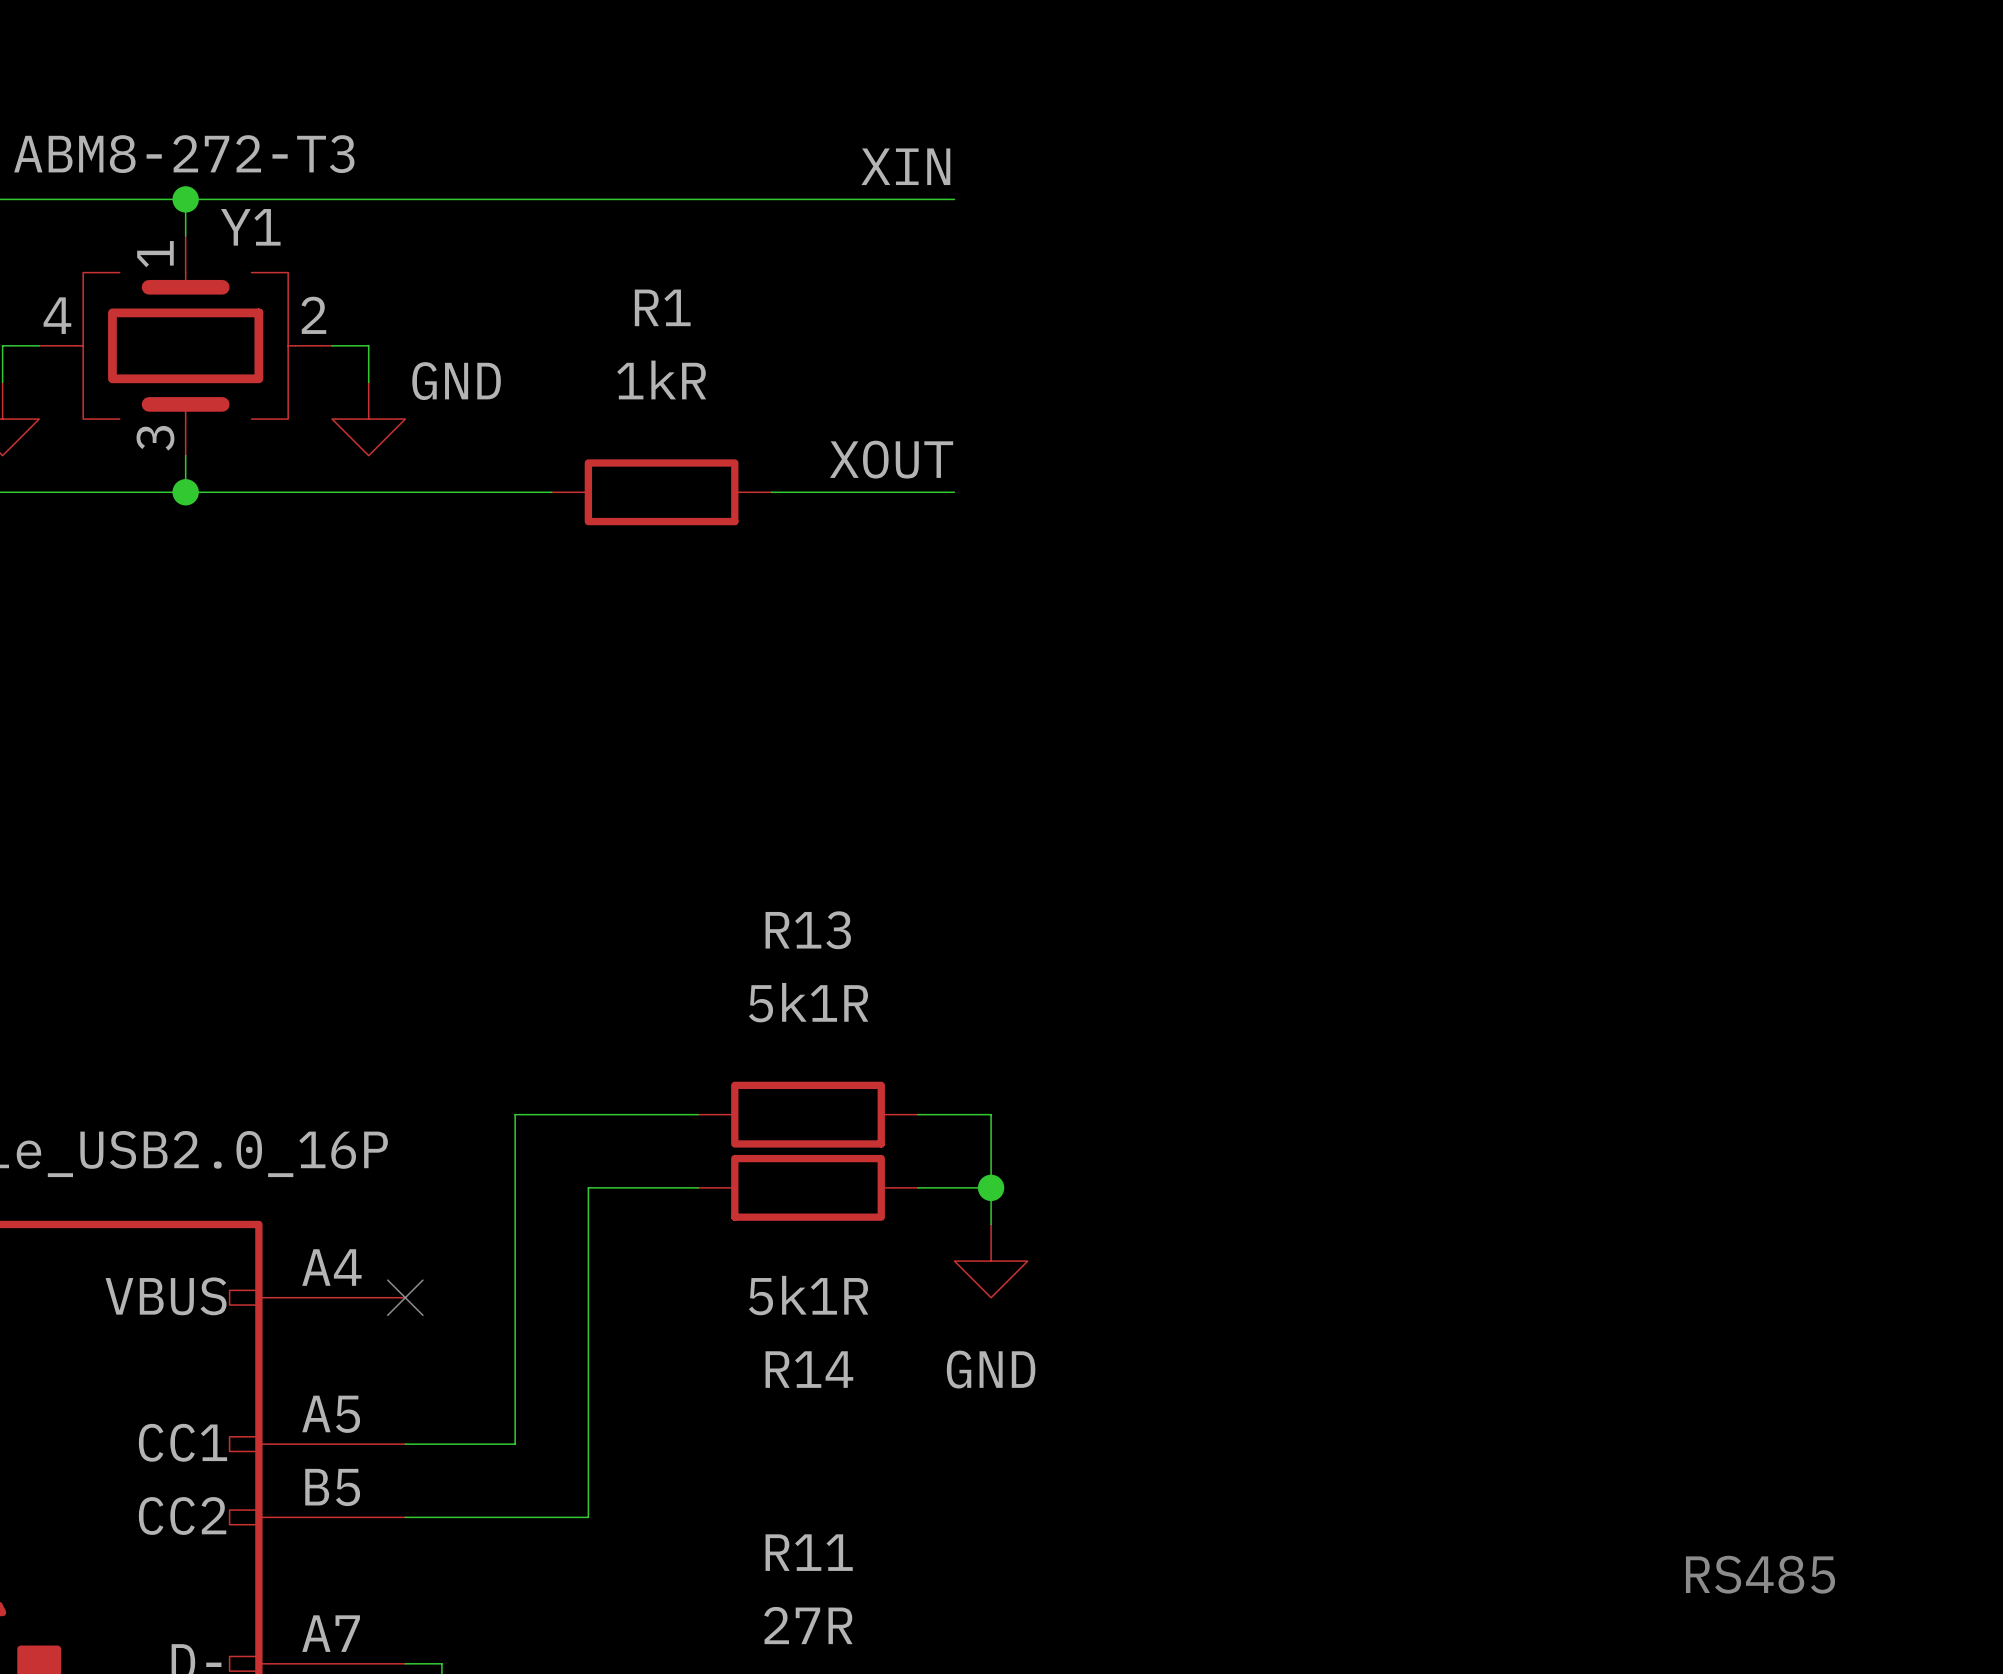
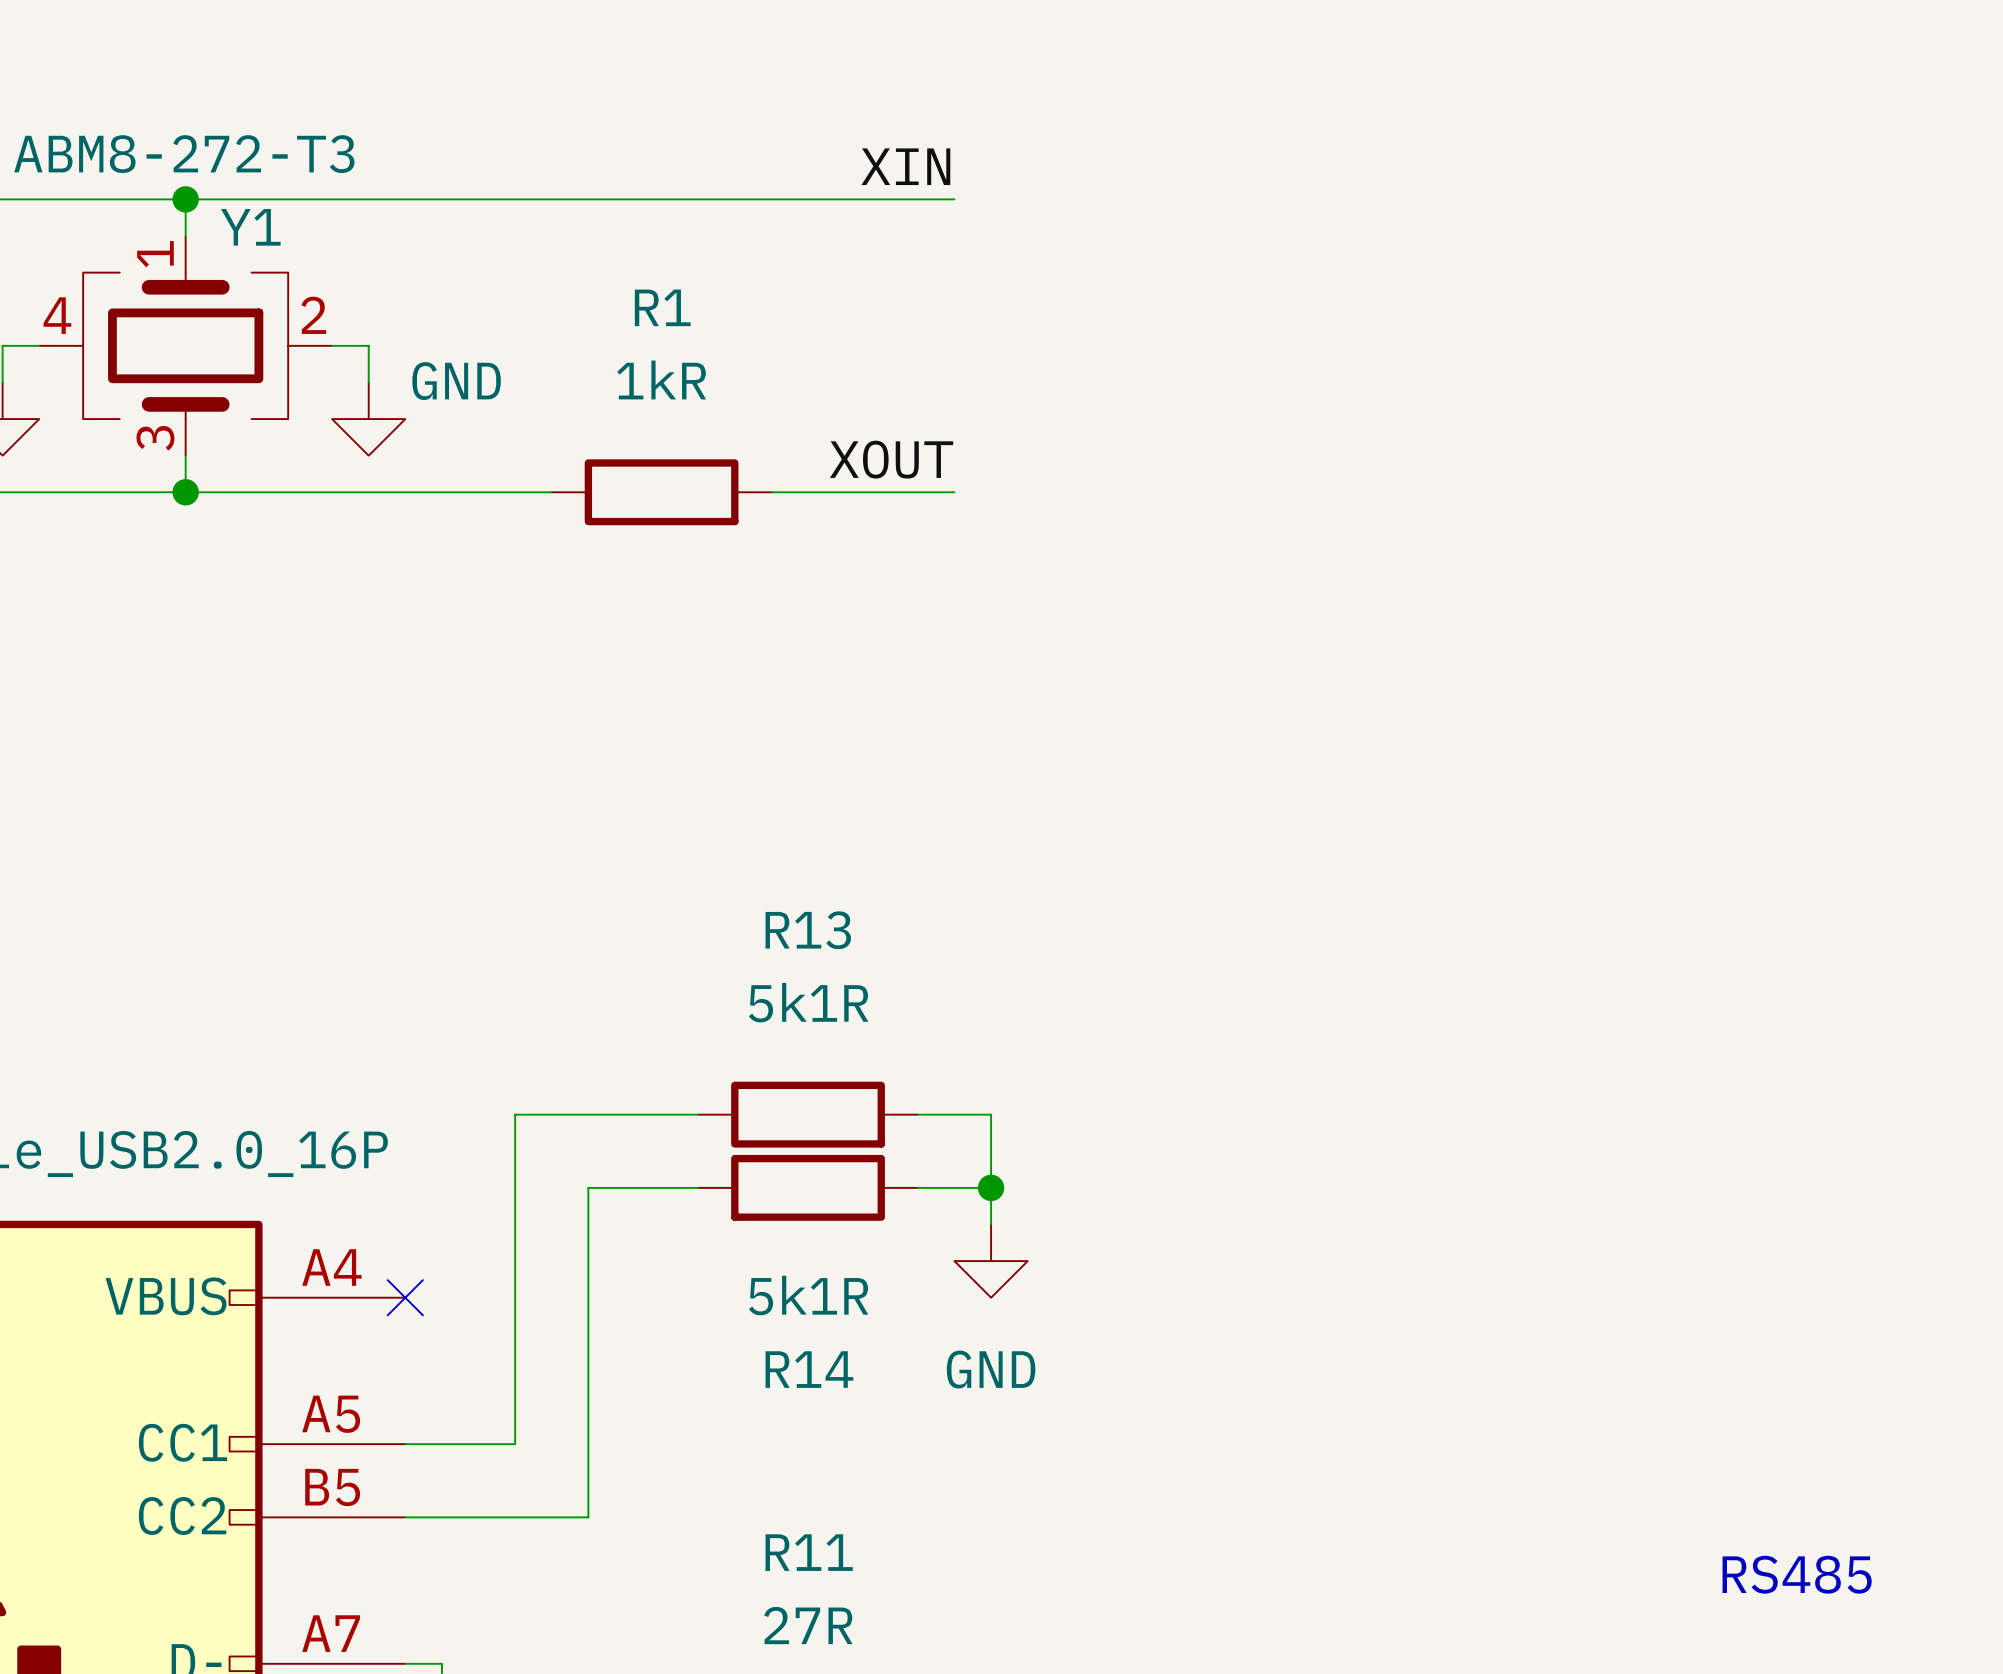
text position: RS485 (1760, 1574) -> RS485 (1797, 1574)

